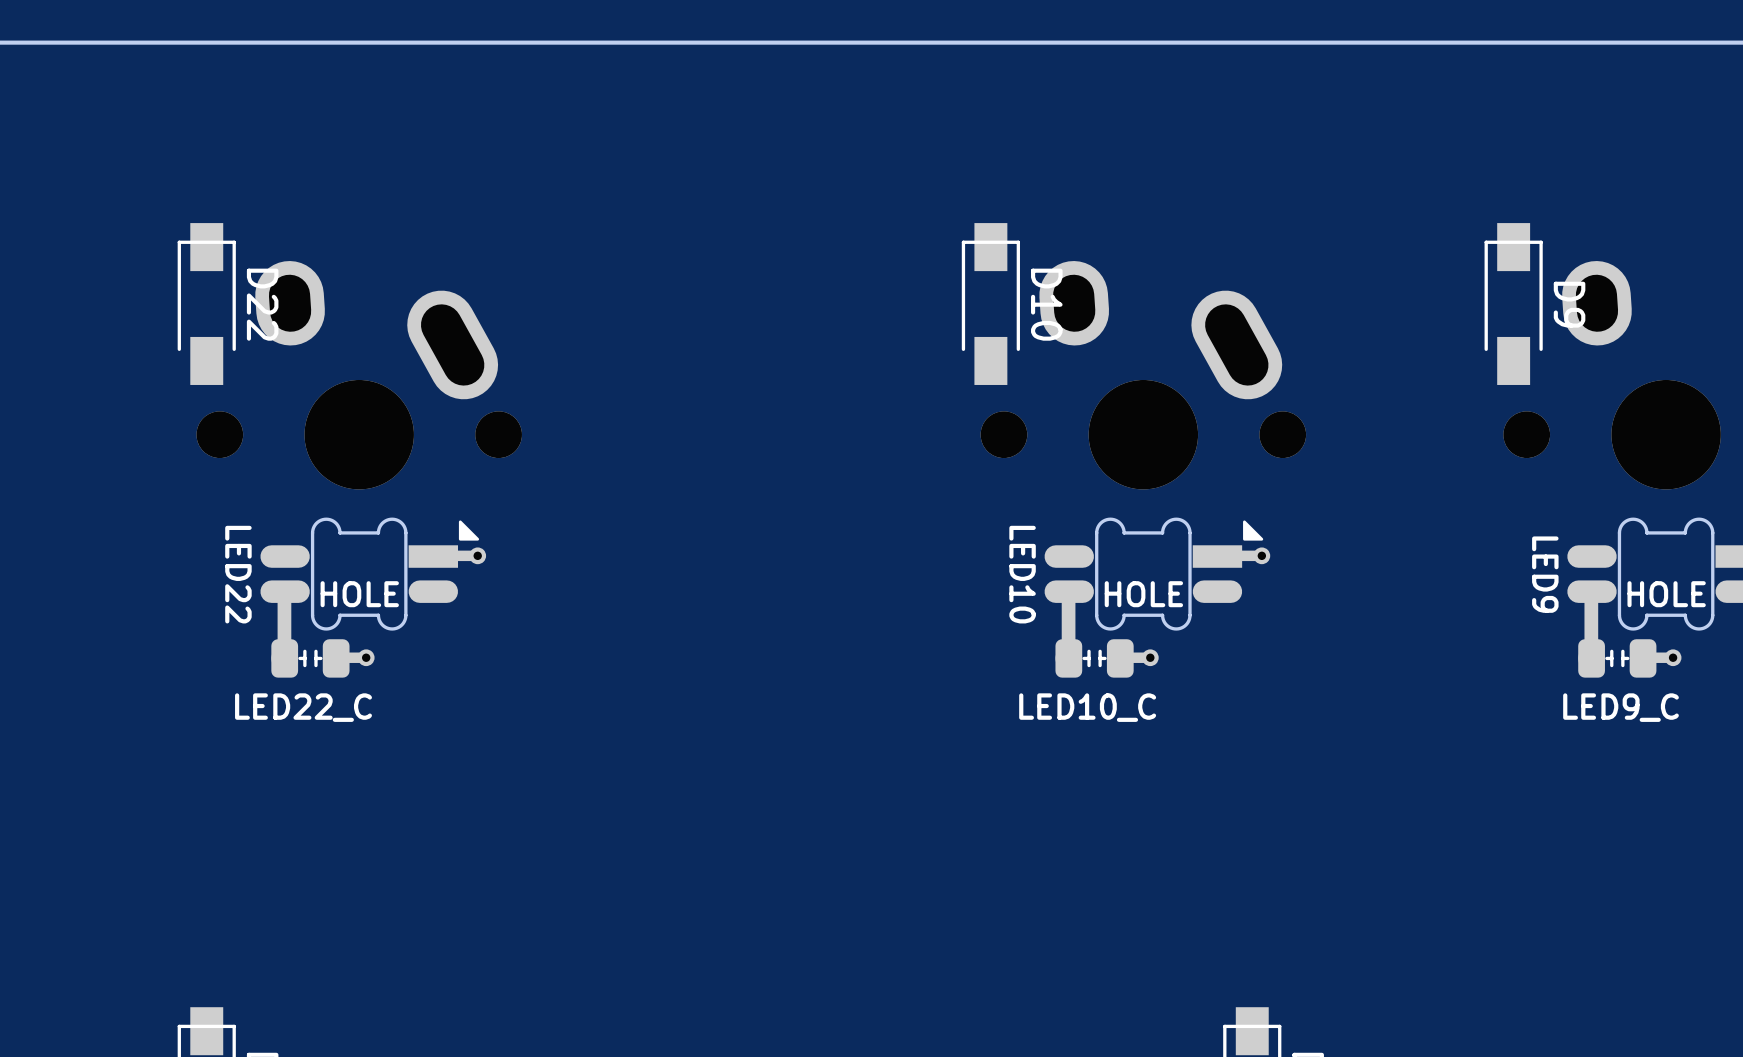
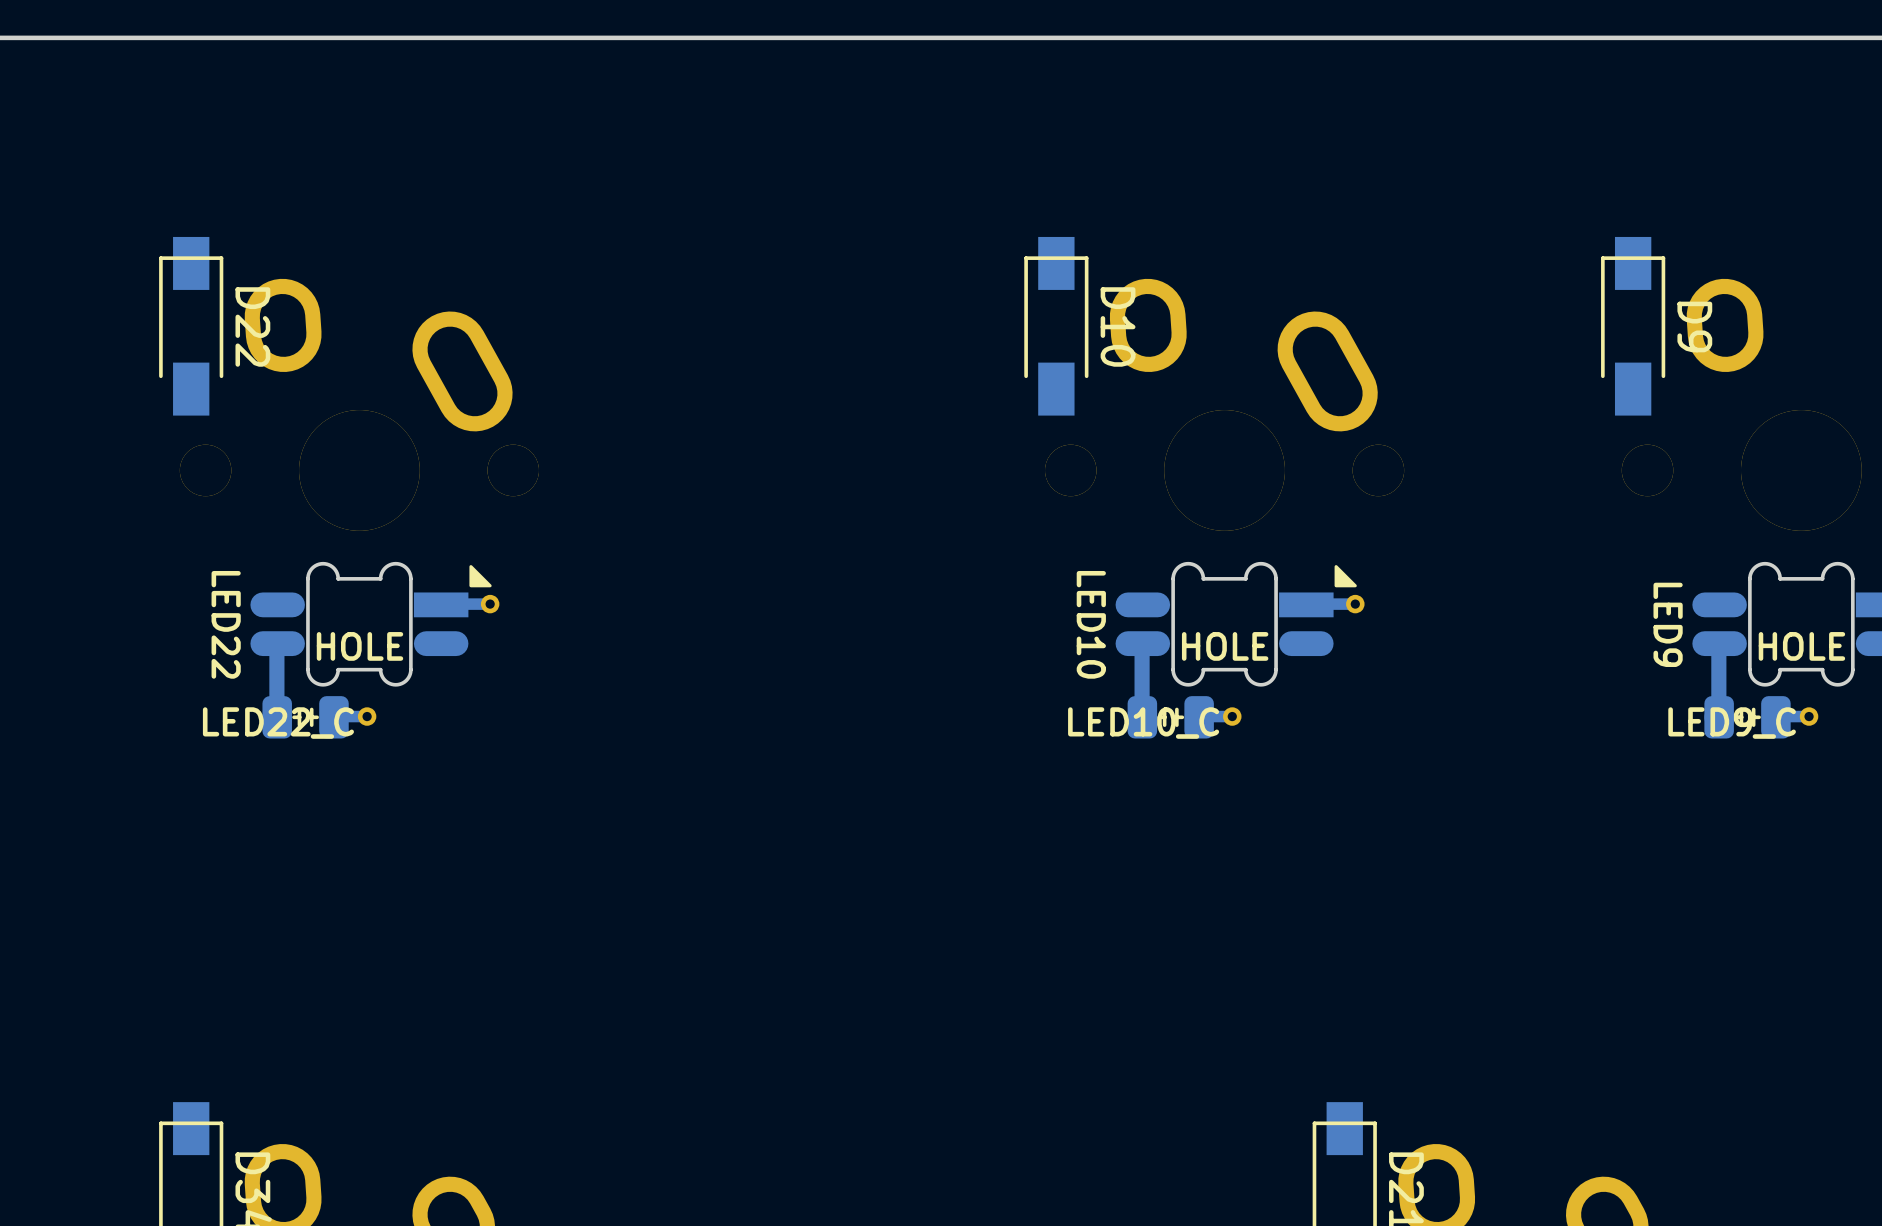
LED22 text position: LED22_C (303, 707) -> LED22_C (278, 723)
LED10 text position: LED10_C (1087, 707) -> LED10_C (1143, 723)
LED9 text position: LED9_C (1621, 707) -> LED9_C (1732, 723)

